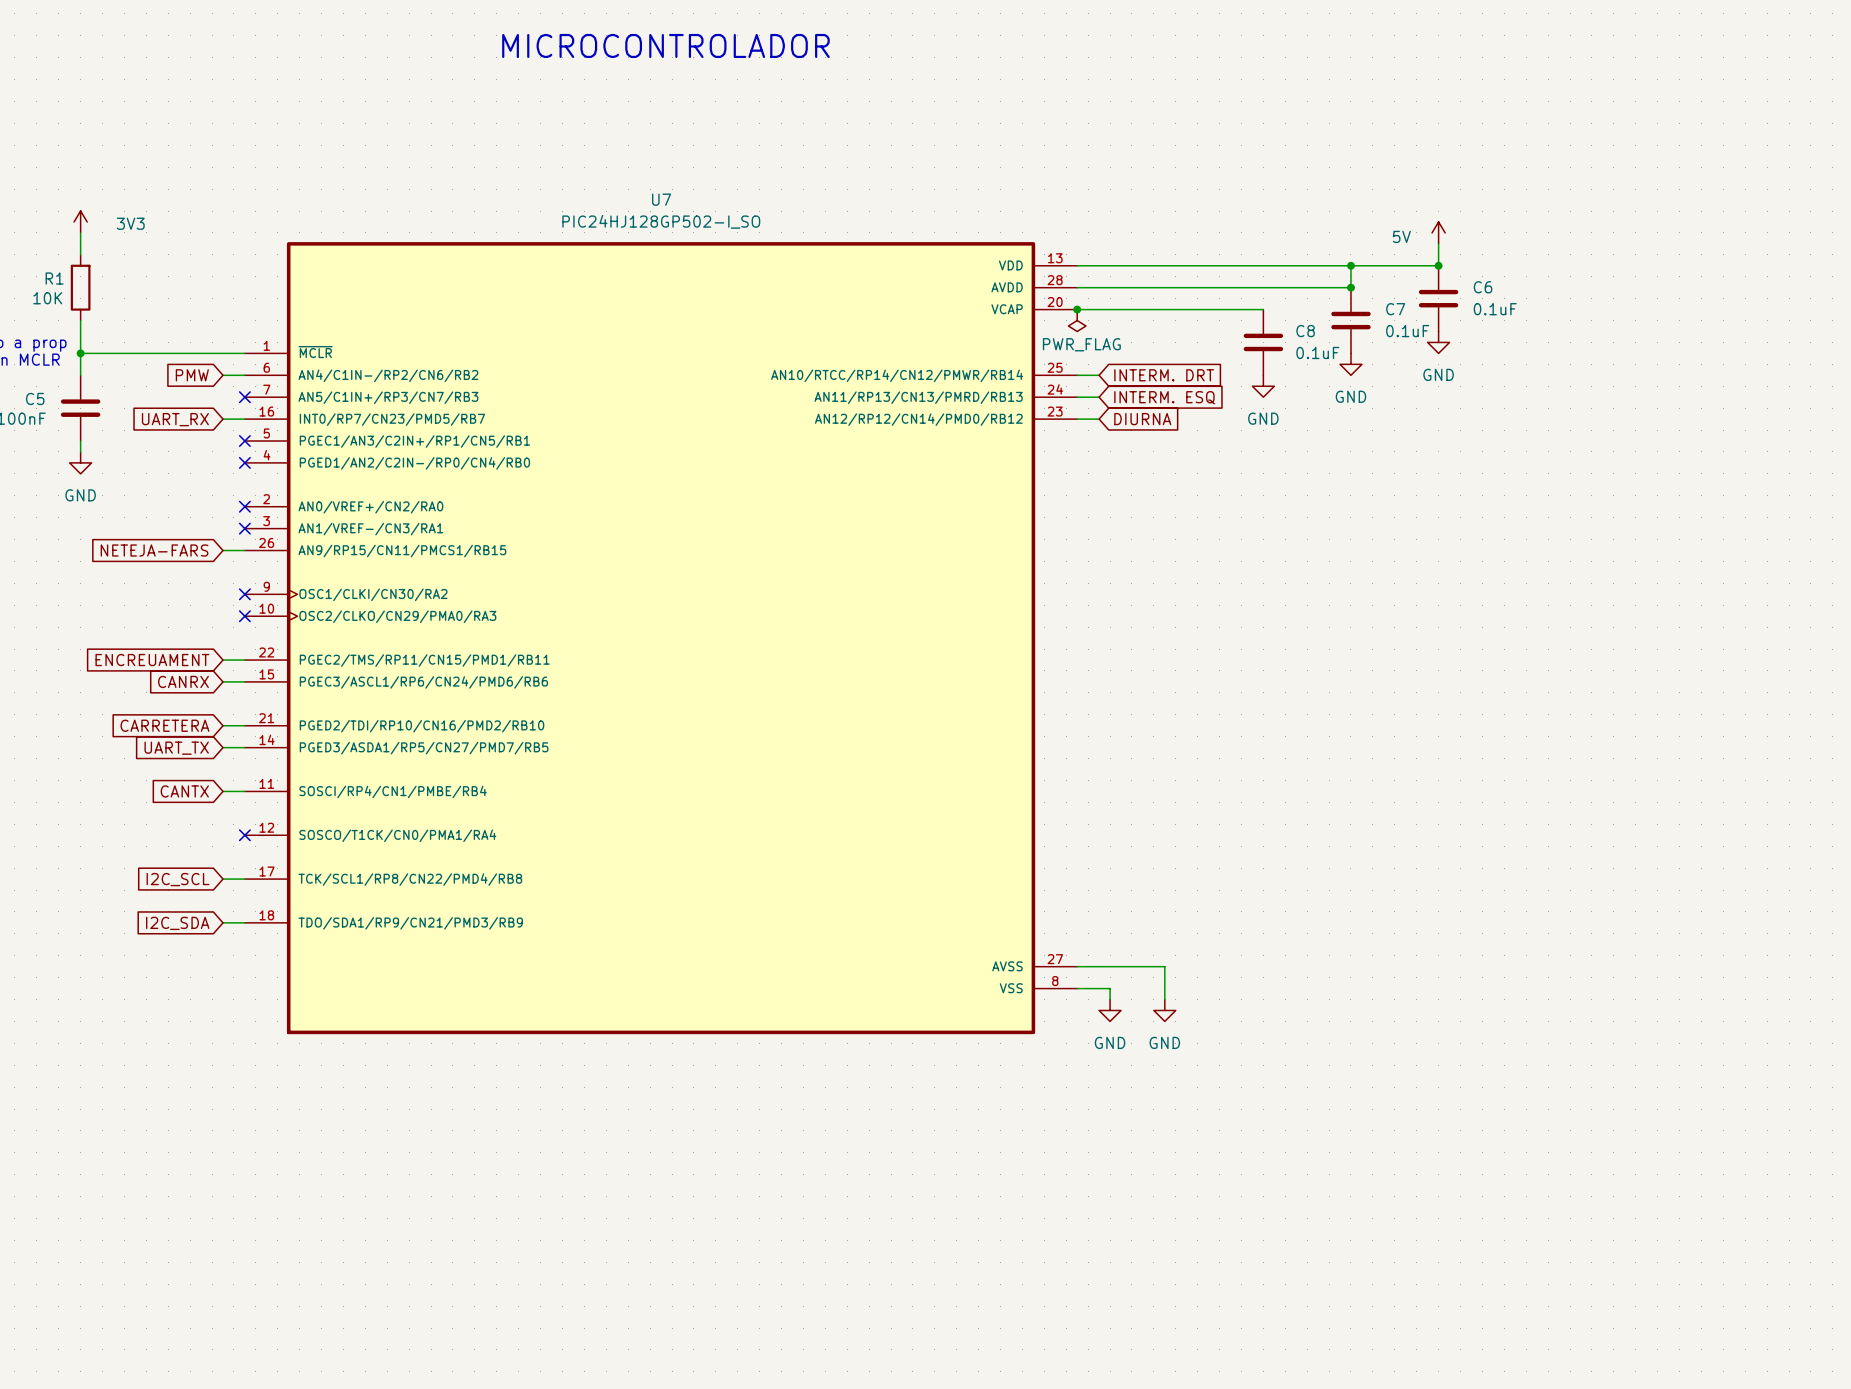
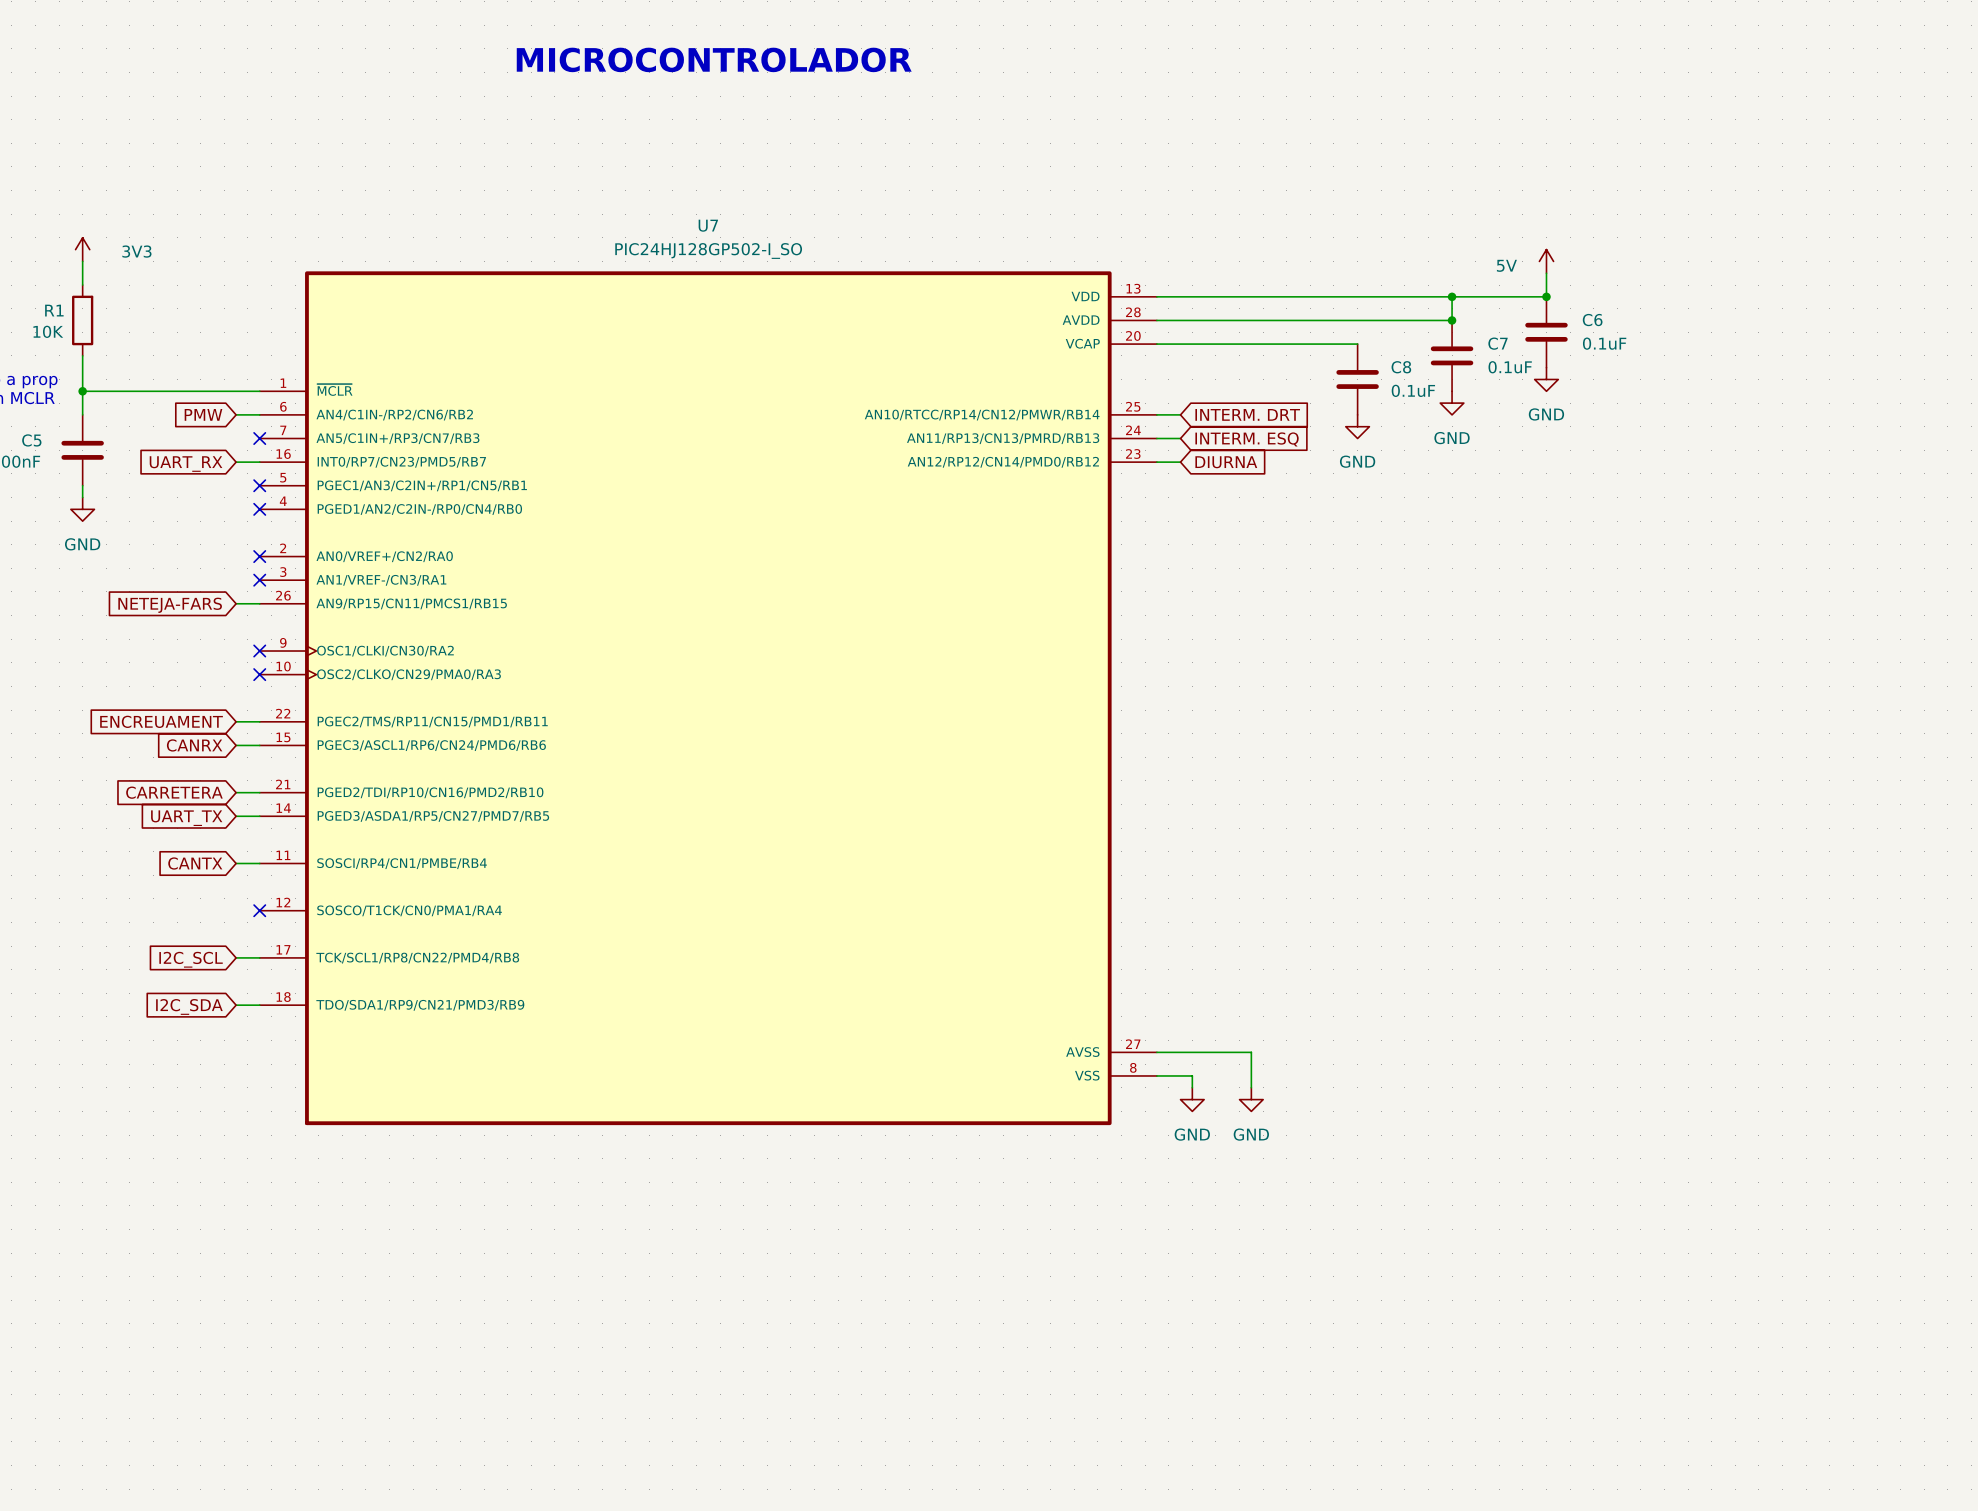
junction: (1077, 309) -> none
power symbol: PWR_FLAG (1077, 320) -> none

